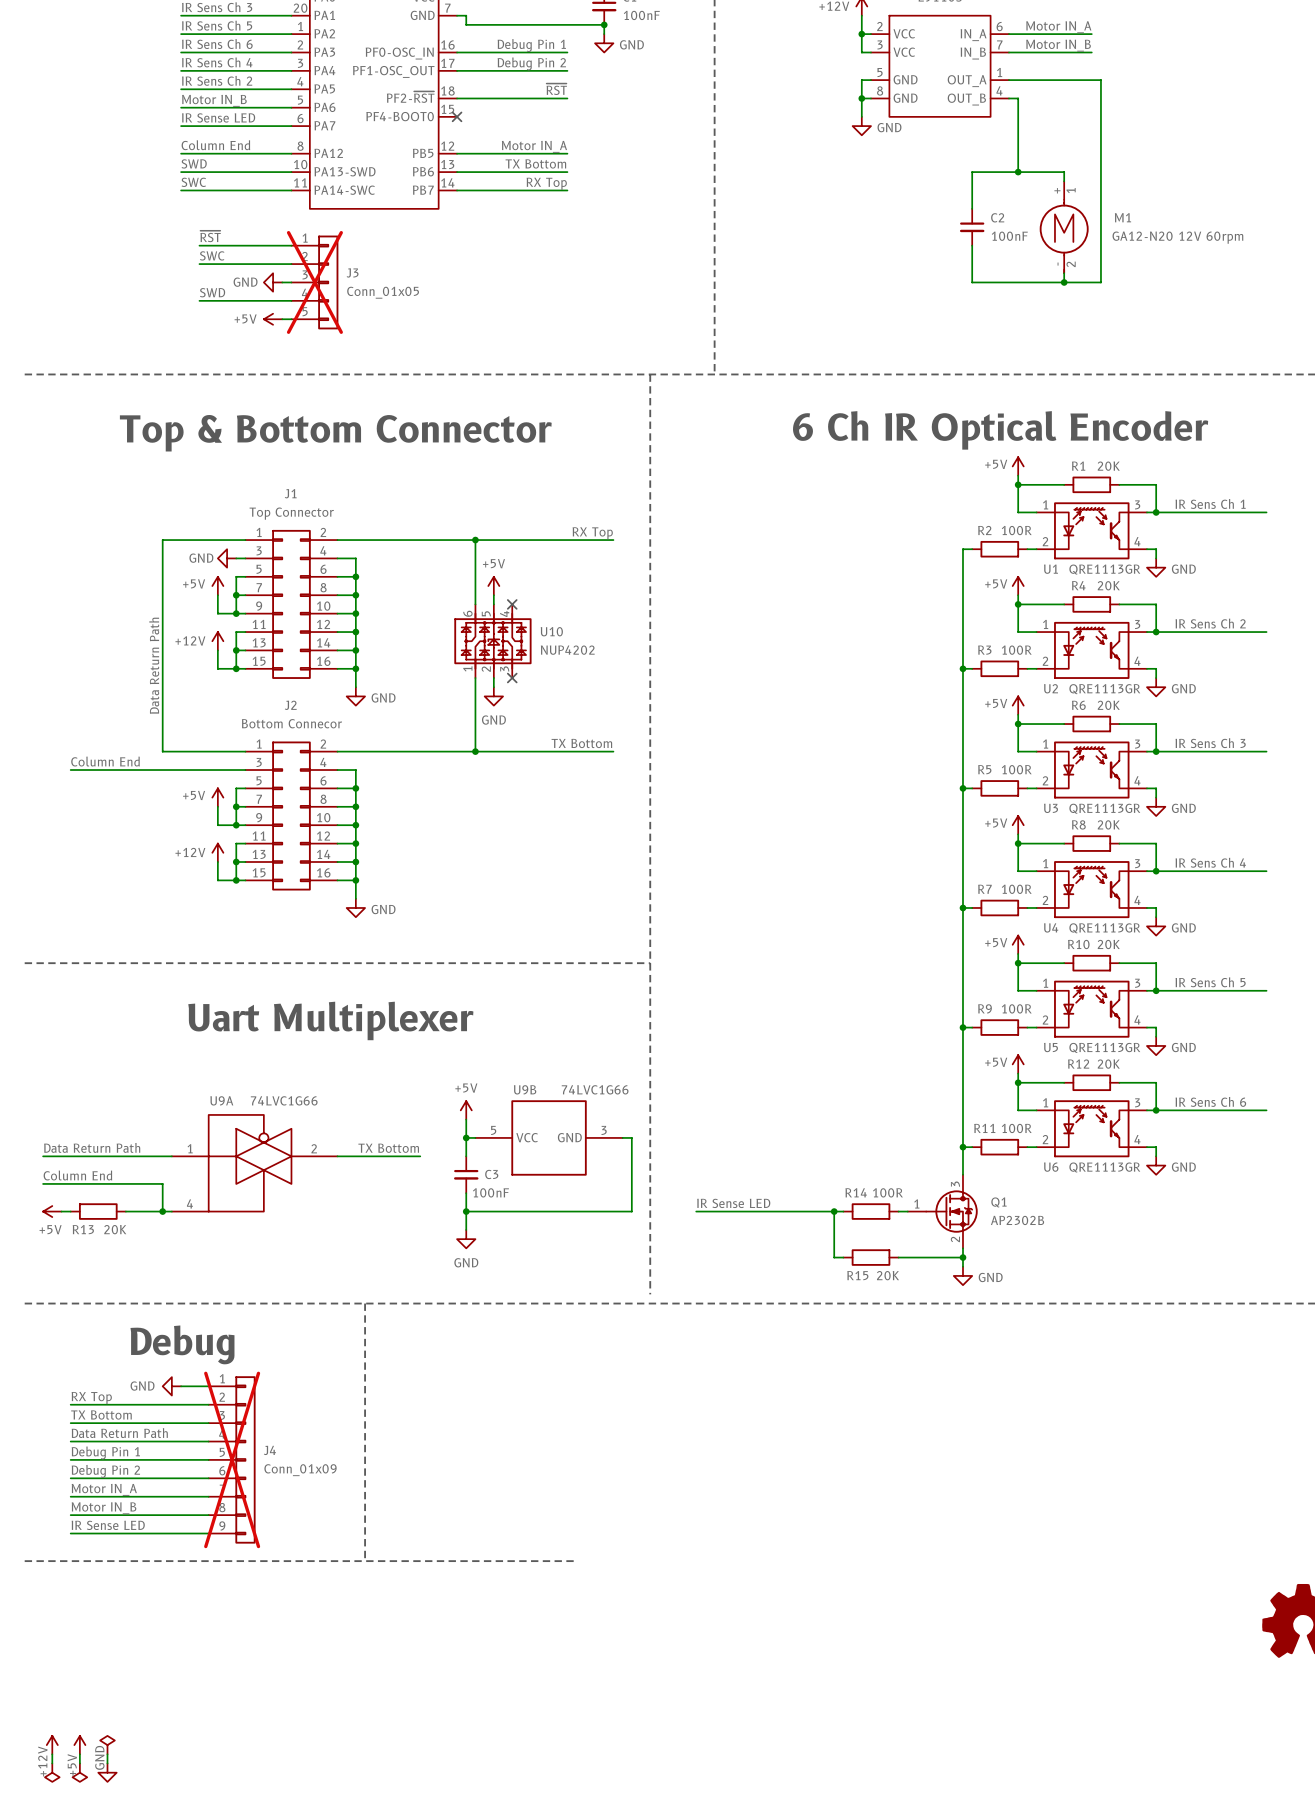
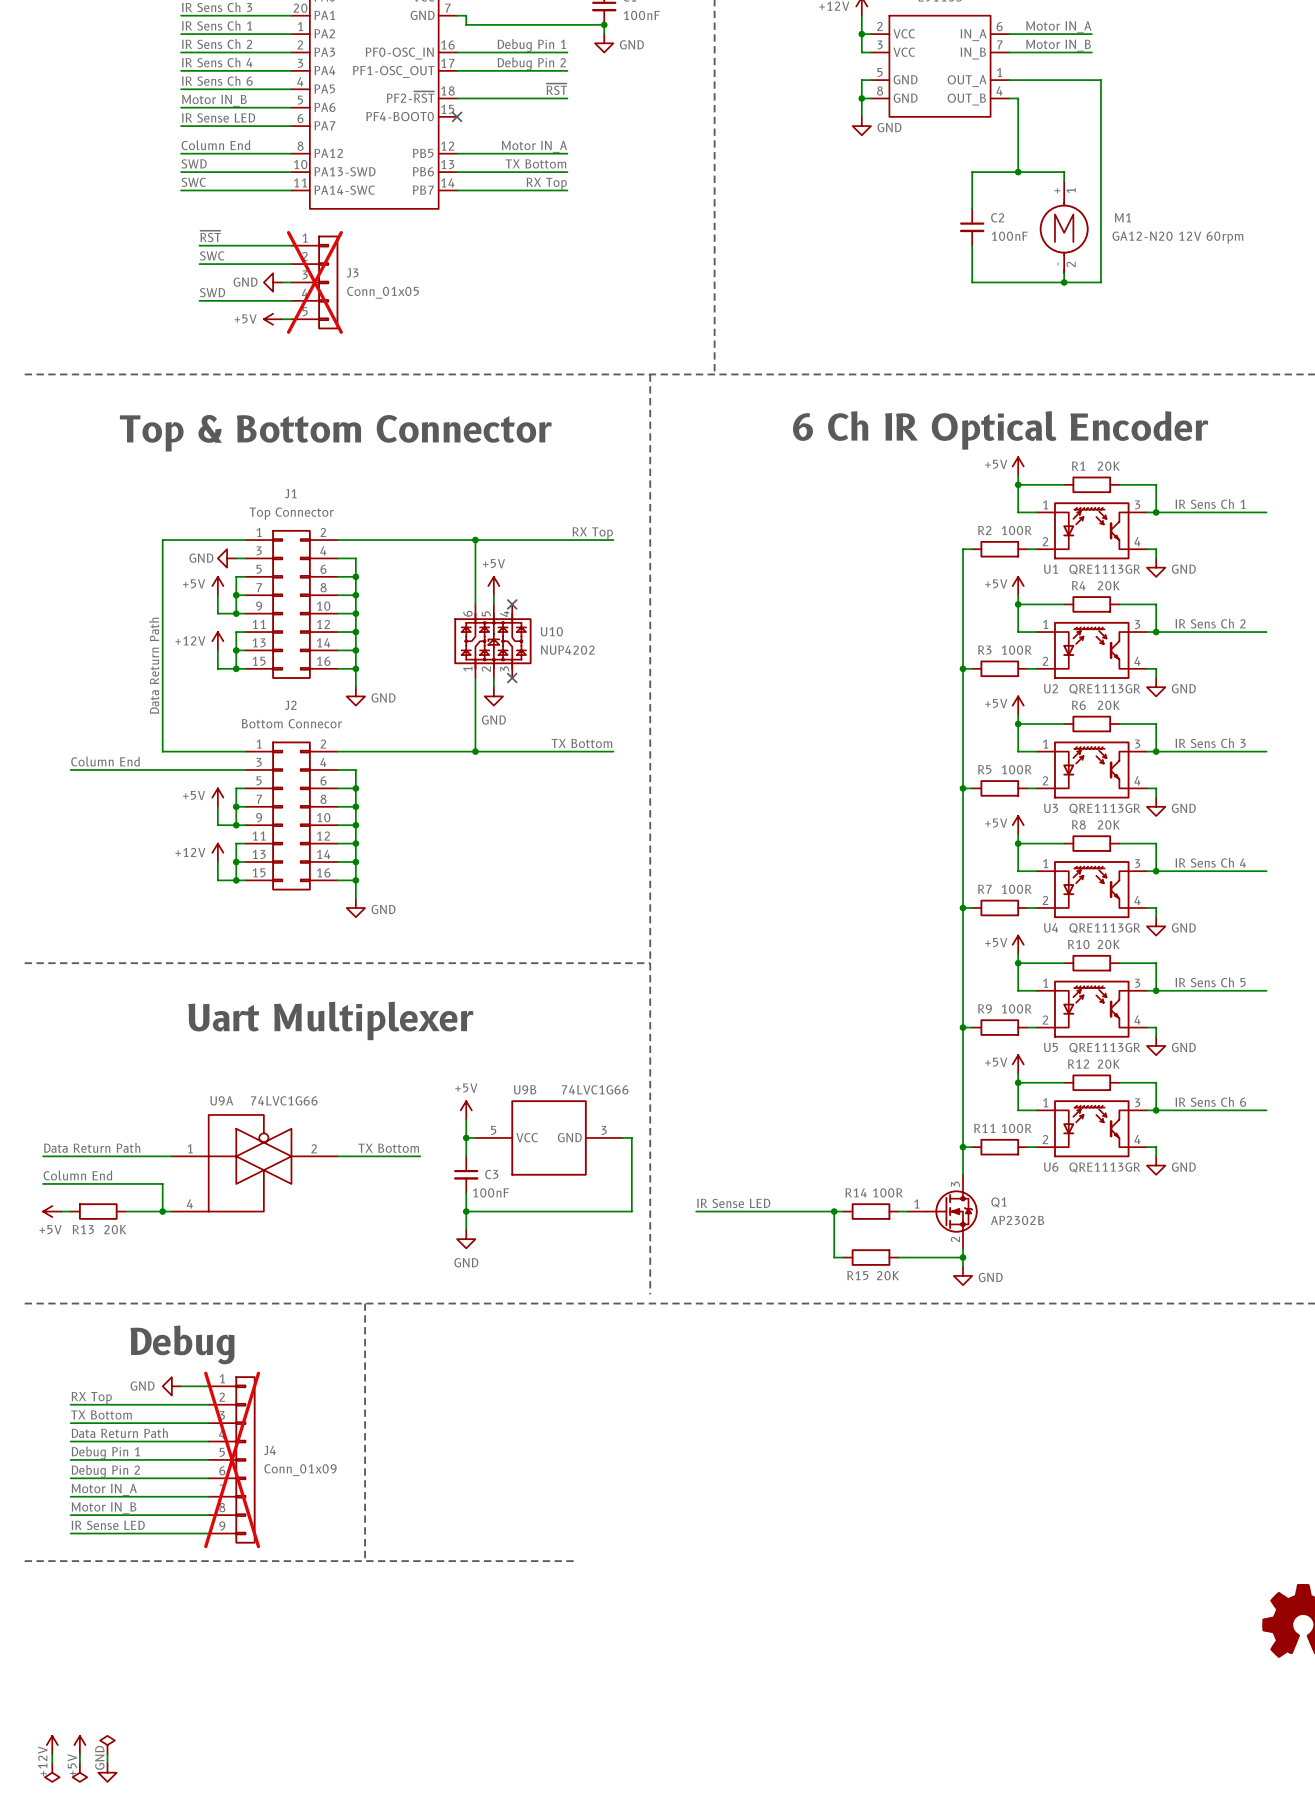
label: IR Sens Ch 5 (217, 25) -> IR Sens Ch 1 (217, 25)
label: IR Sens Ch 6 (217, 44) -> IR Sens Ch 2 (217, 44)
label: IR Sens Ch 2 (217, 80) -> IR Sens Ch 6 (217, 80)

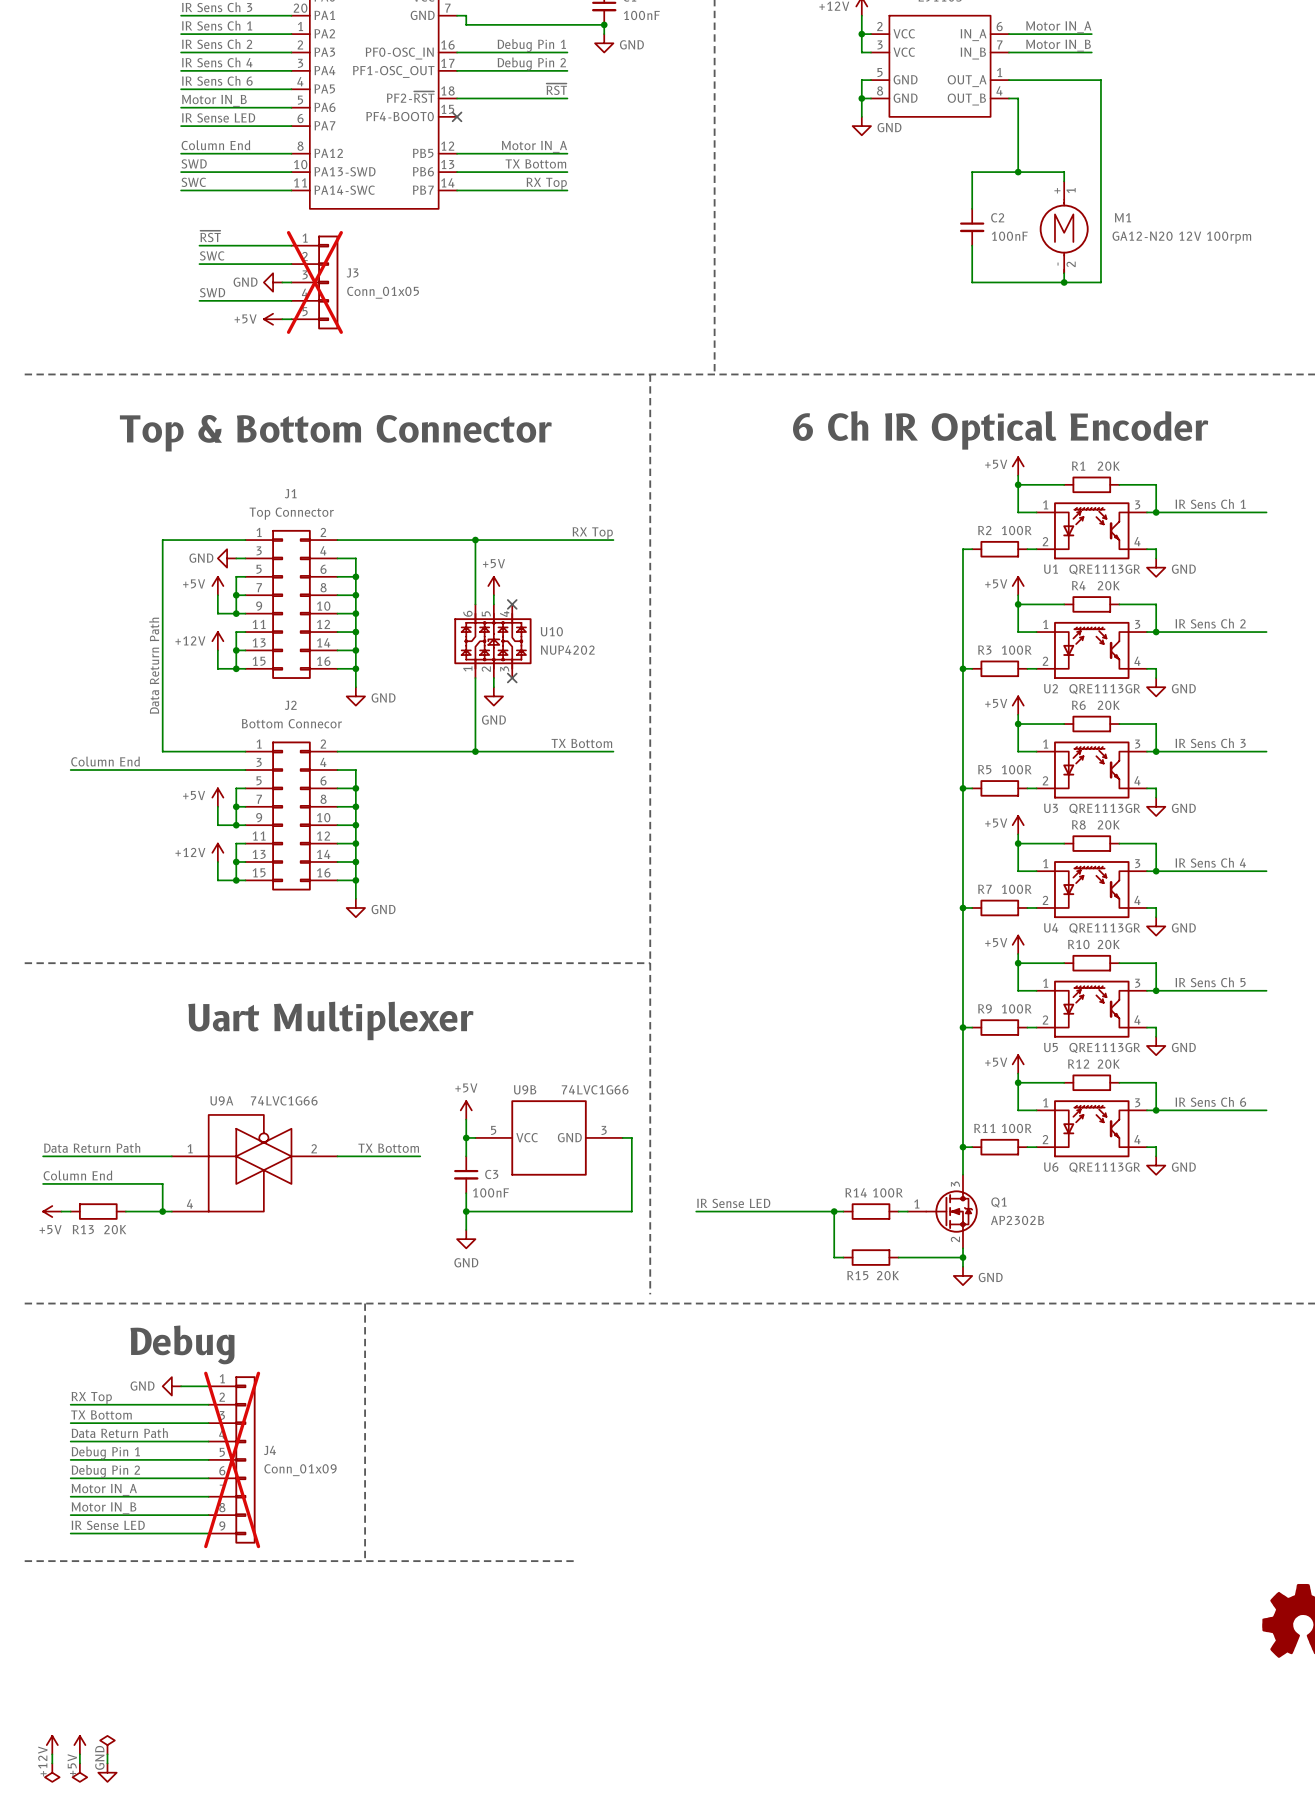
M1 value: GA12-N20 12V 60rpm (1177, 237) -> GA12-N20 12V 100rpm (1181, 237)

